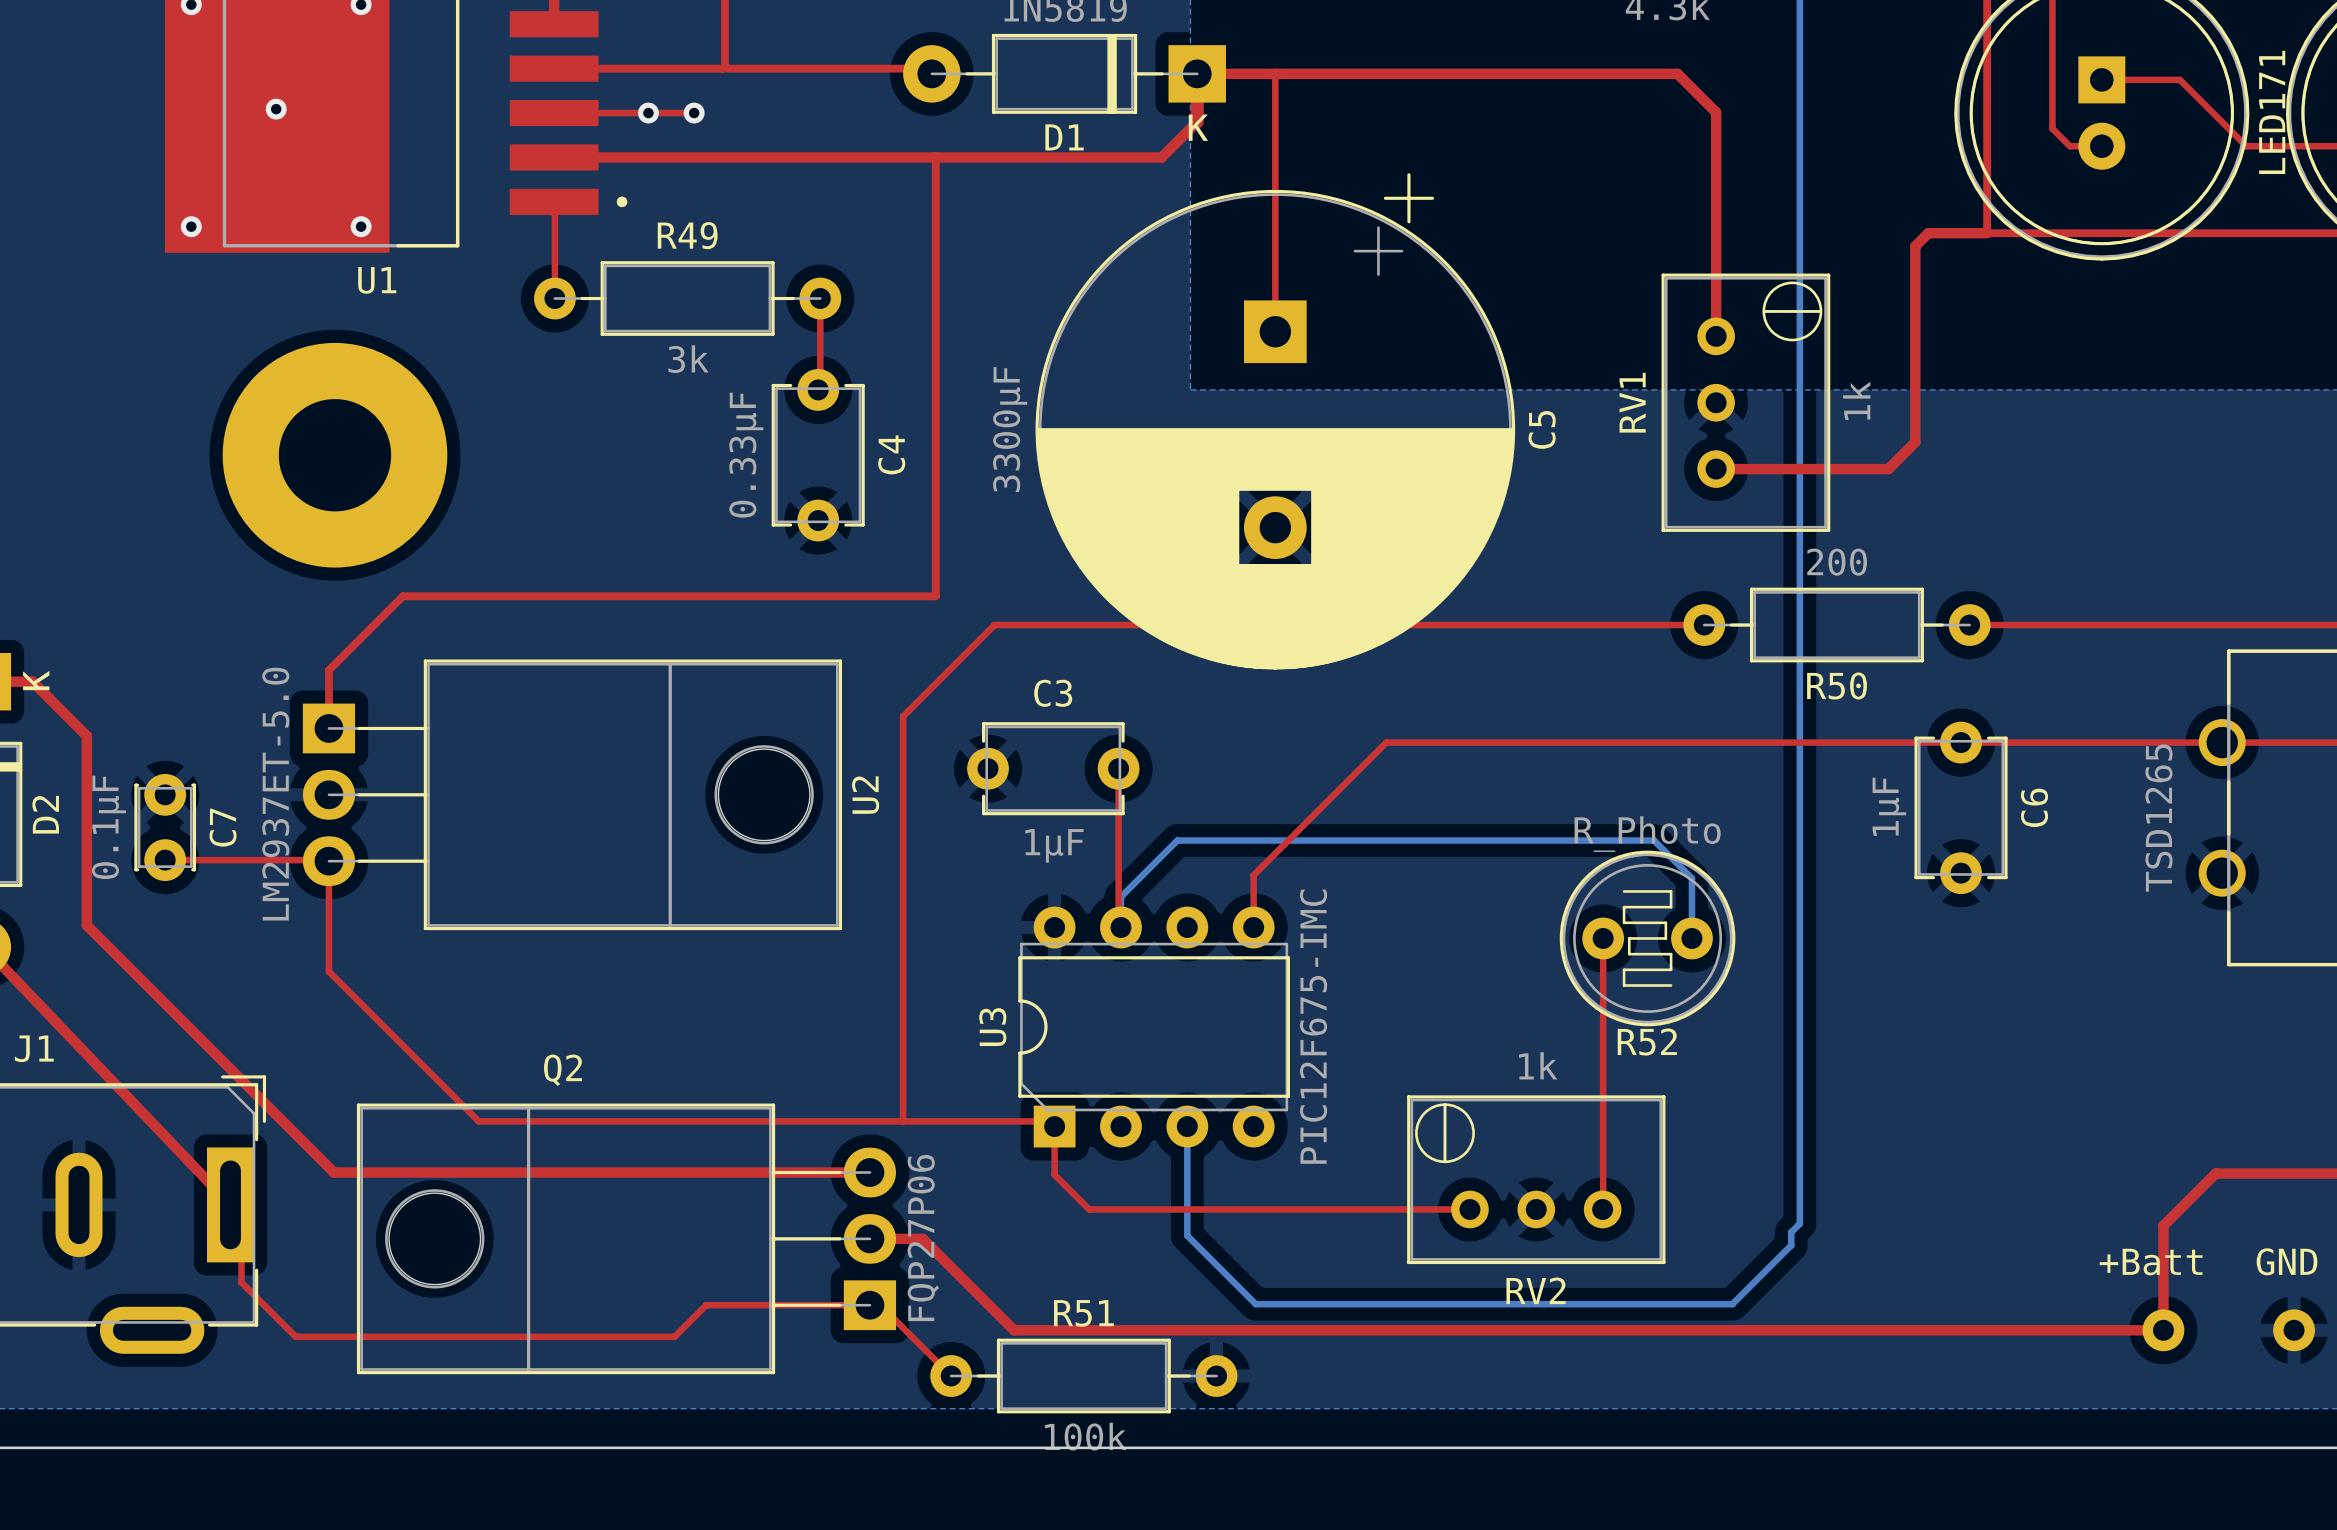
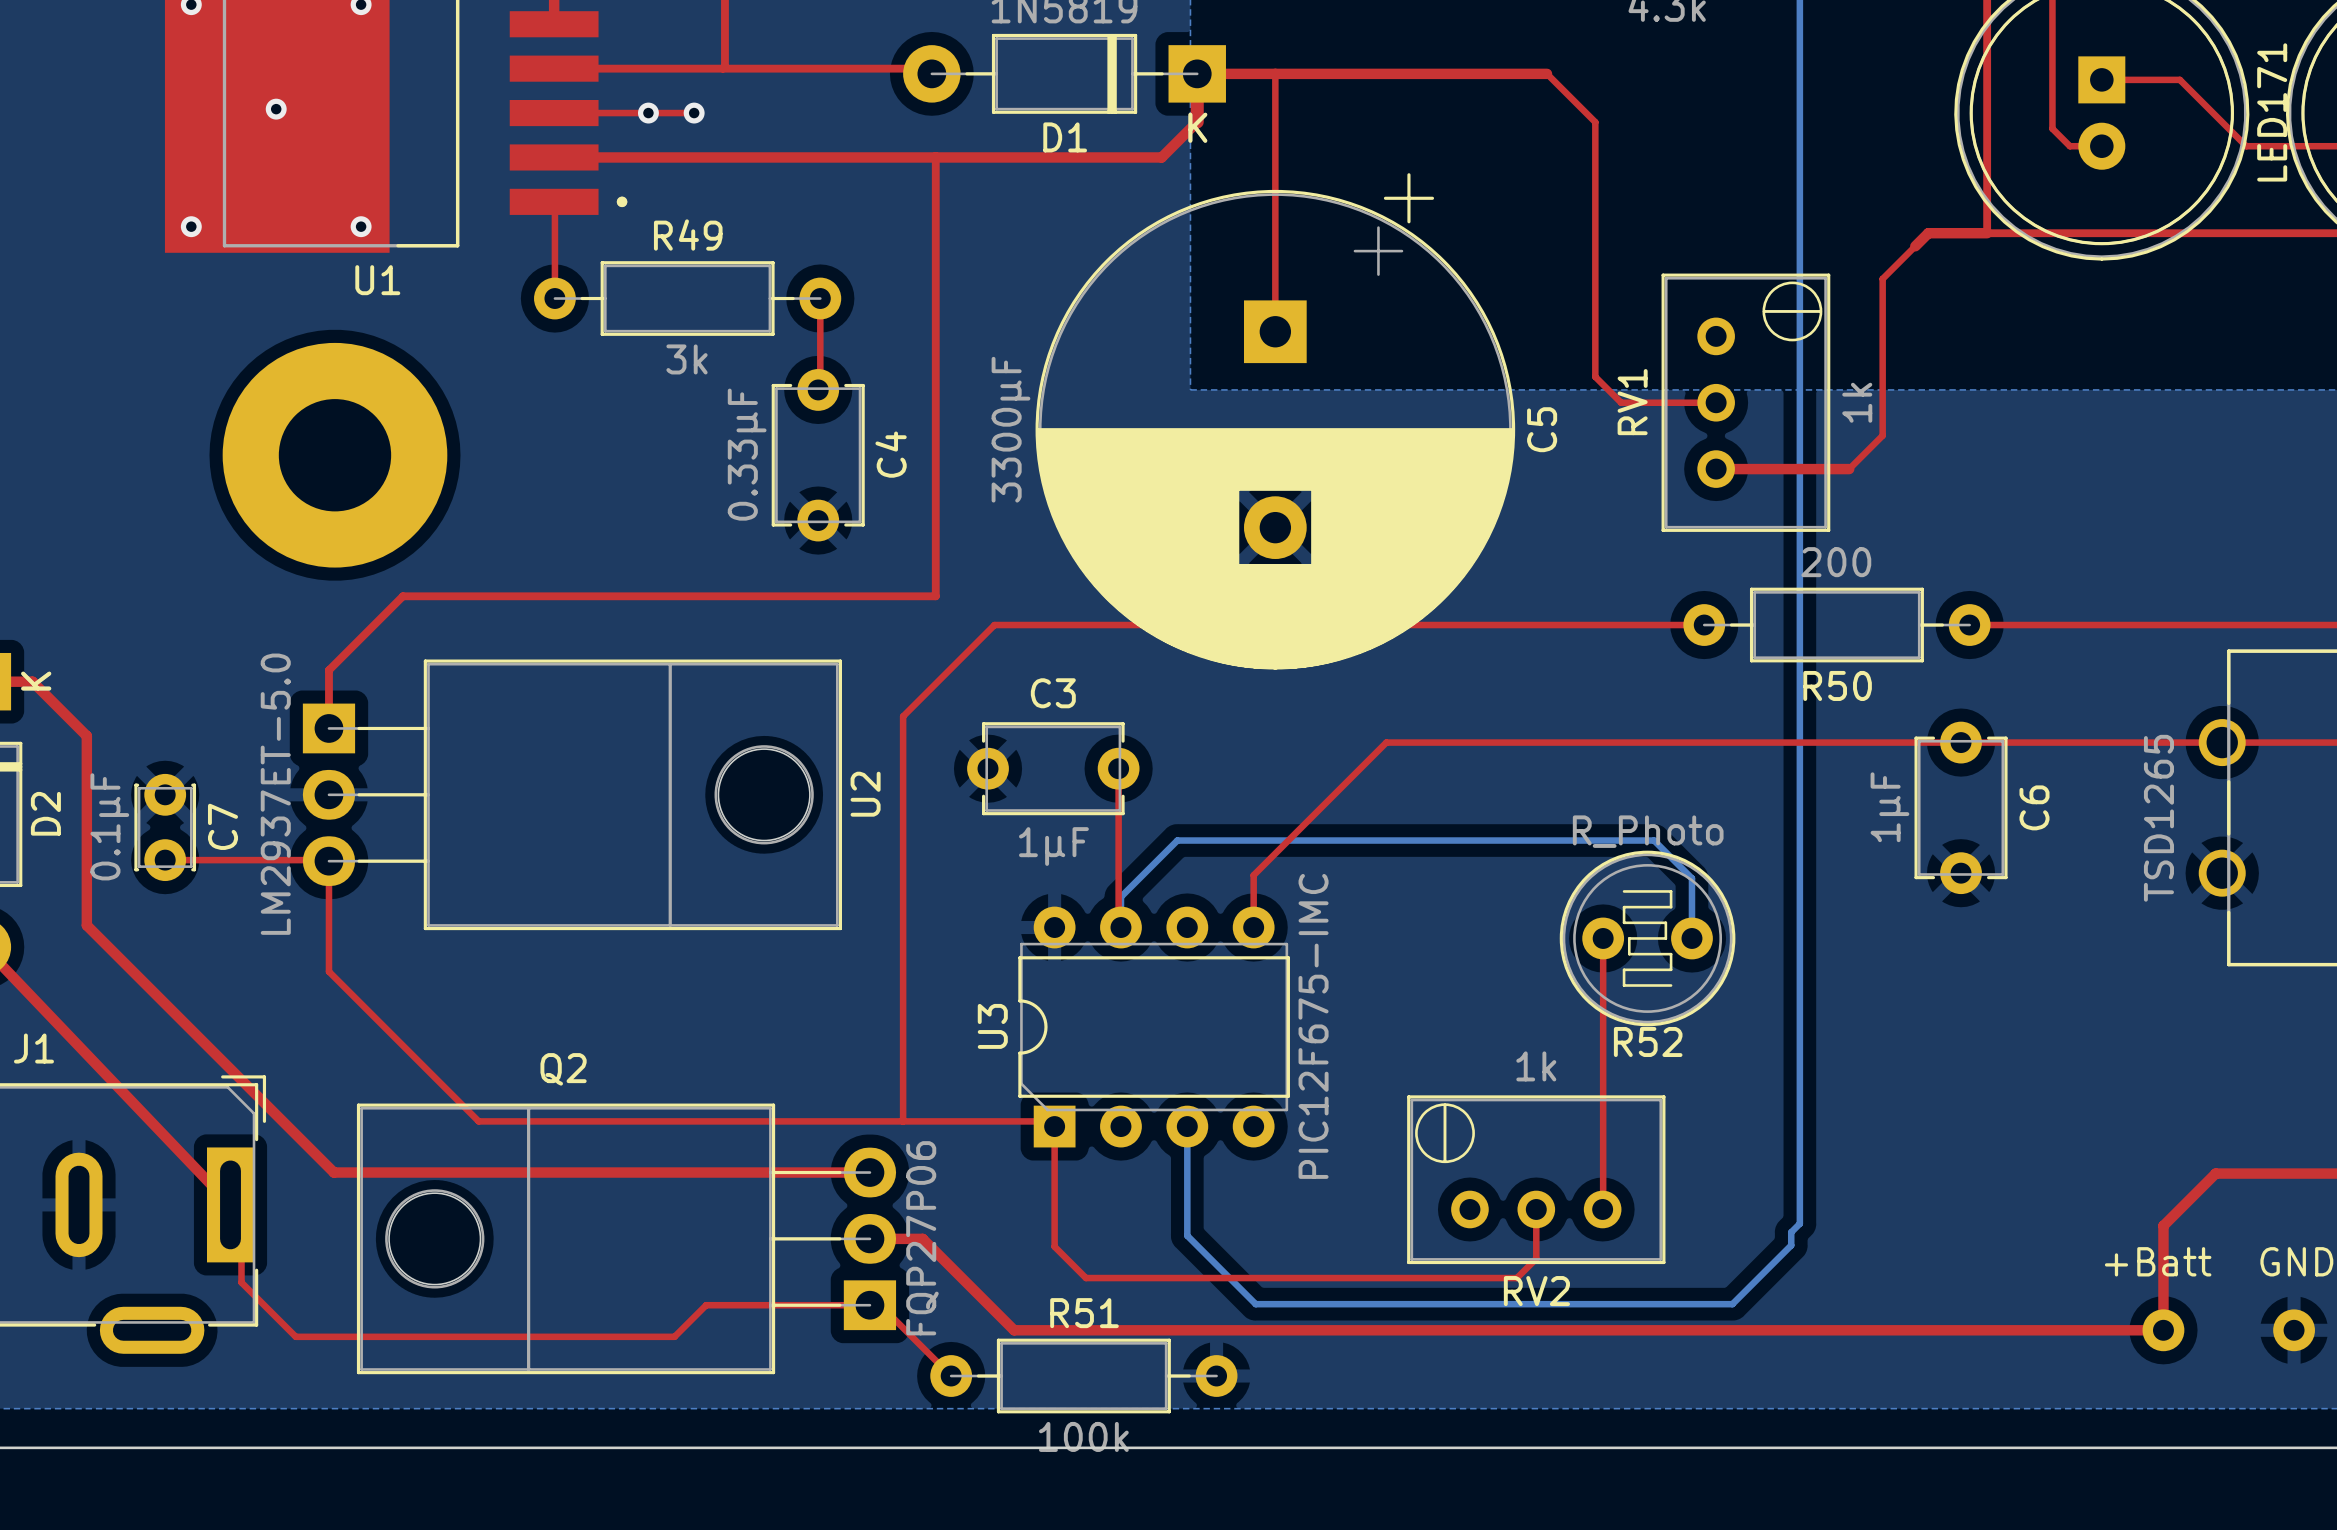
top track: (1547, 73) (1677, 73) (1716, 112) (1716, 336) -> (1547, 73) (1595, 122) (1595, 376) (1621, 402) (1716, 402)
top track: (1915, 246) (1915, 442) (1888, 469) (1849, 469) -> (1915, 246) (1882, 278) (1882, 435) (1849, 469)
top track: (1054, 1174) (1089, 1209) (1469, 1209) -> (1054, 1174) (1054, 1246) (1085, 1278) (1516, 1278) (1536, 1258) (1536, 1209)

